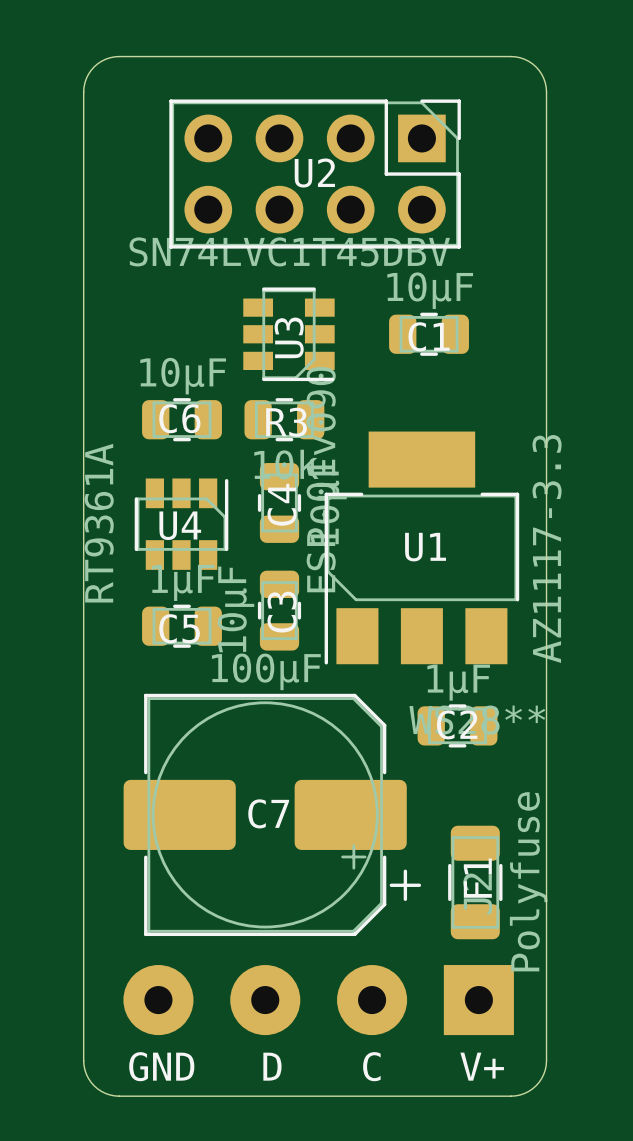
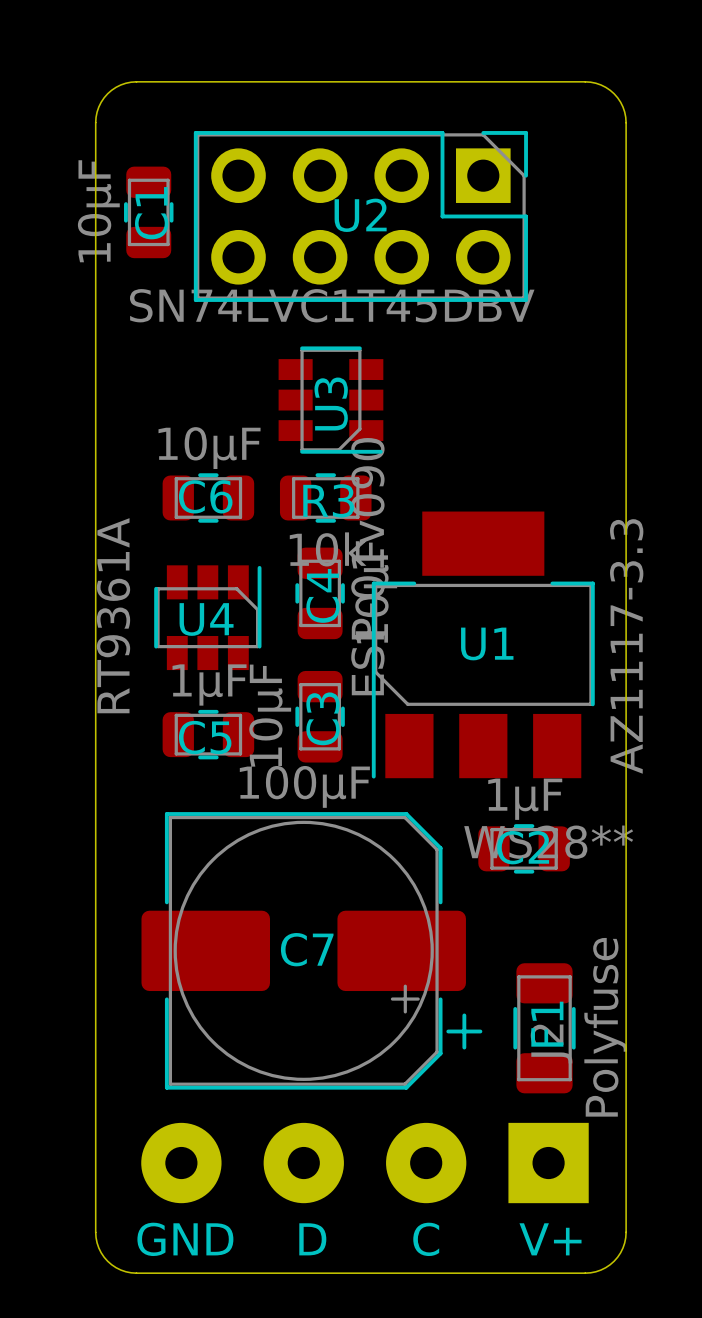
C1 value position: 10µF (430, 290) -> 10µF (98, 211)
C1 rotation: 0° (429, 334) -> 90° clockwise (148, 212)
C1 position: (429, 334) -> (148, 212)

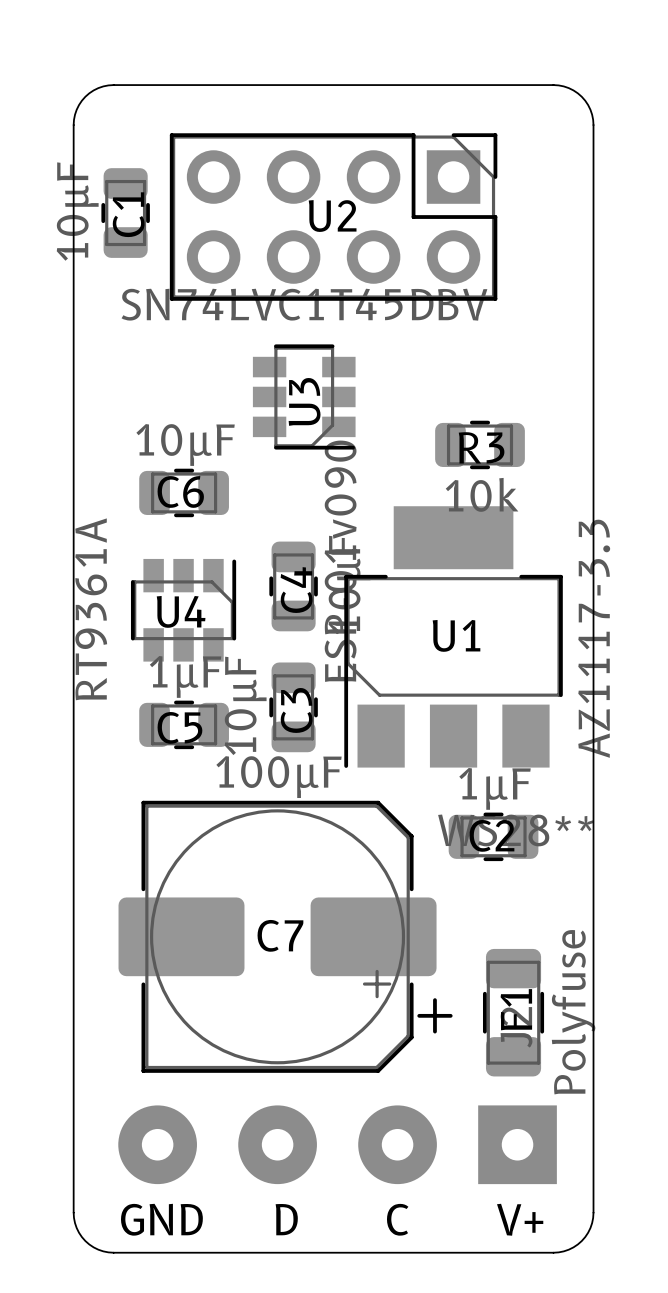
R3 position: (325, 497) -> (480, 444)

